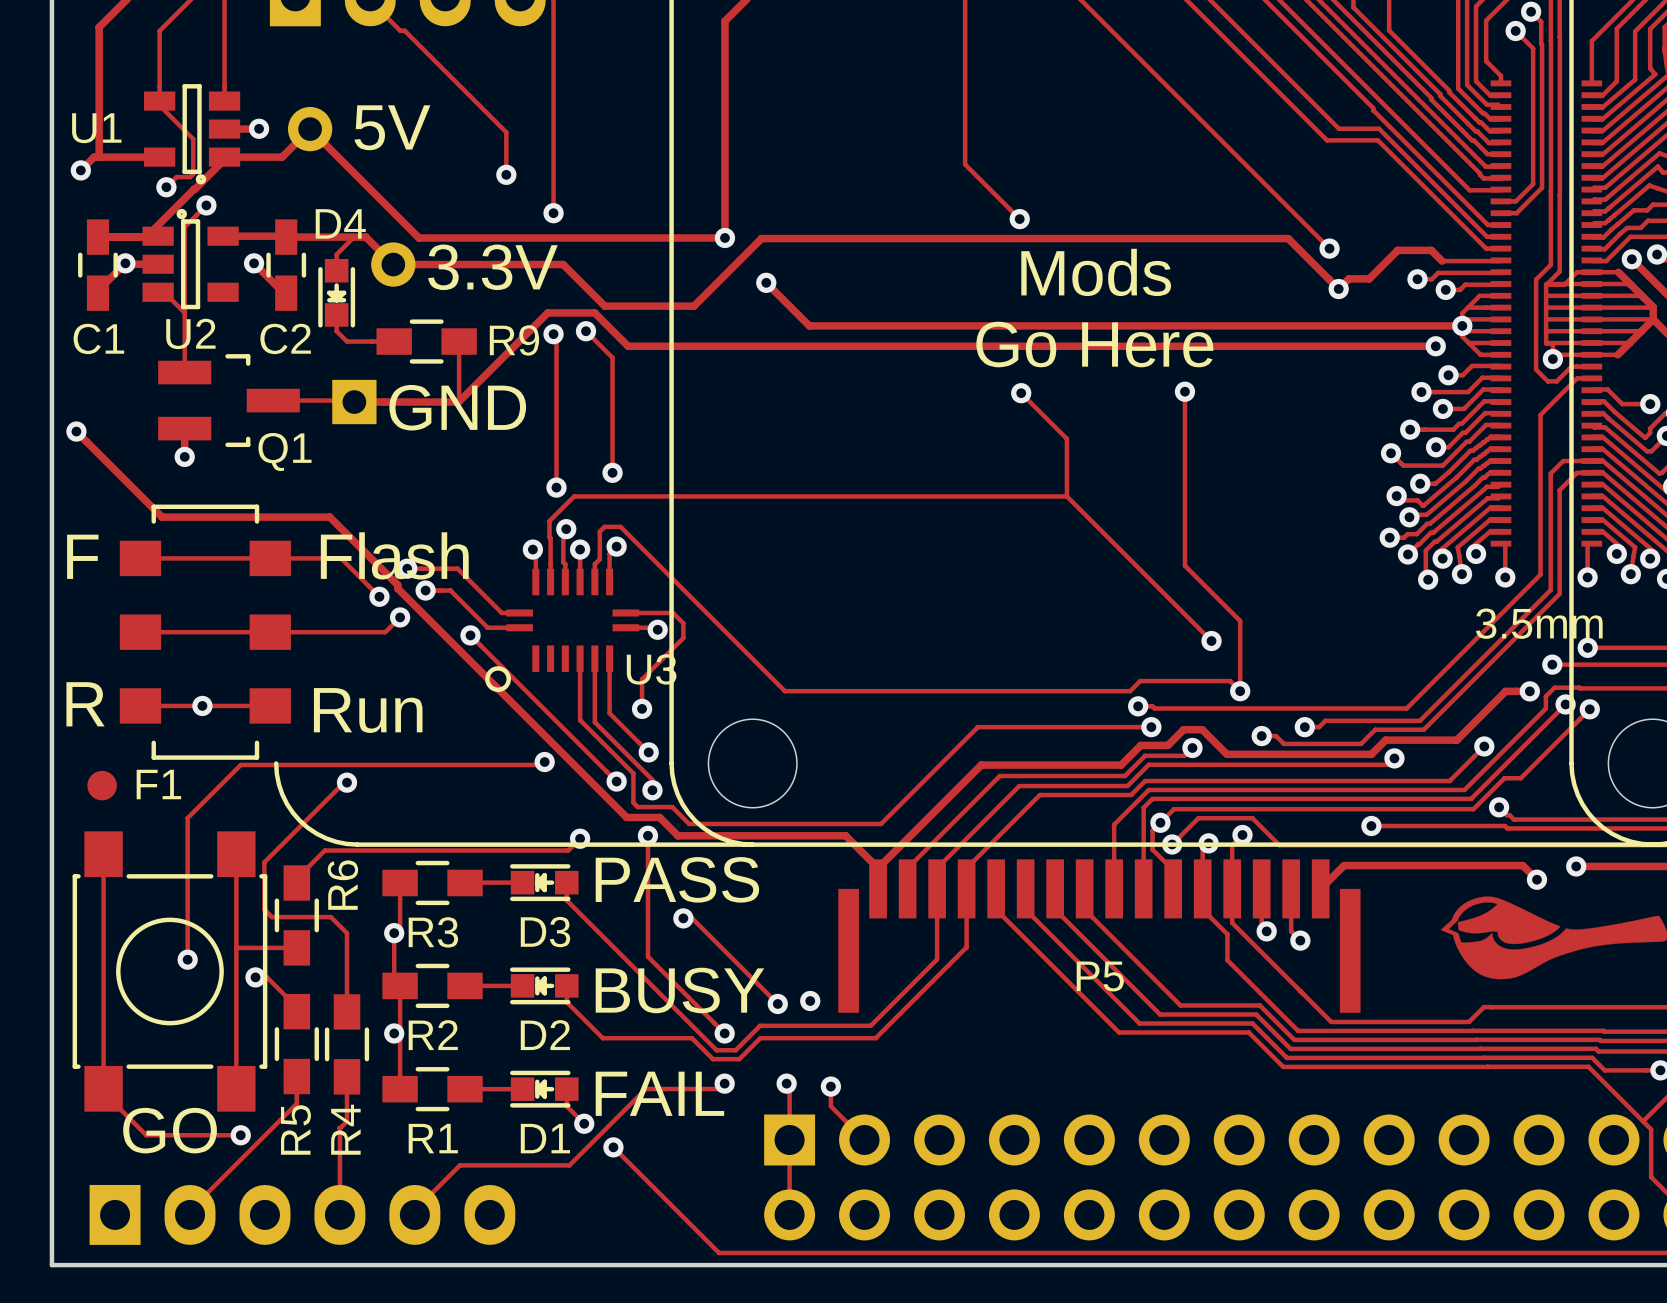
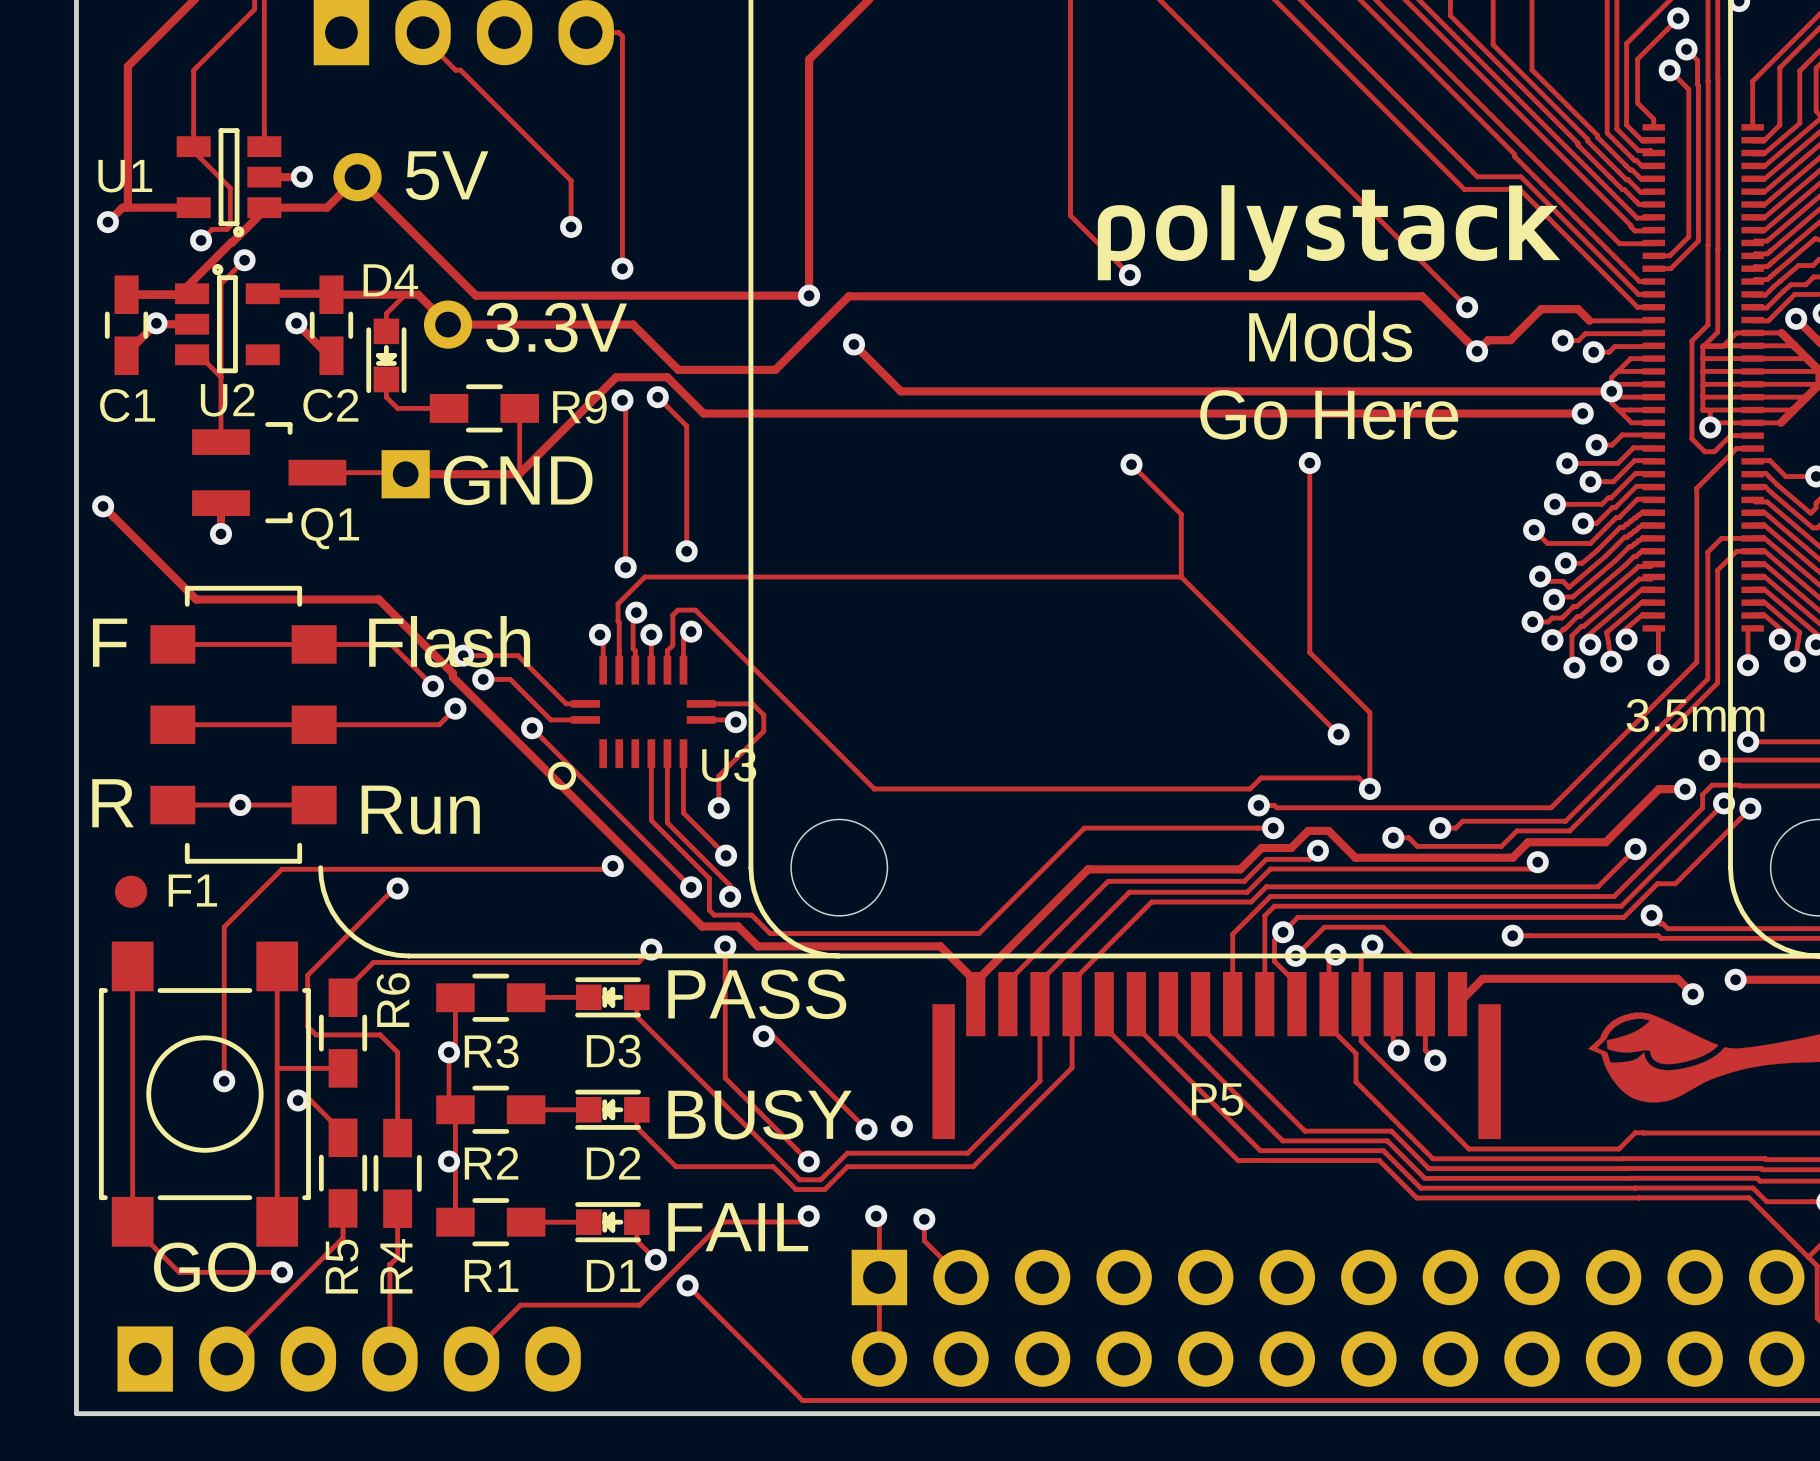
drawing: none -> [1097, 185, 1561, 282]
text position: Mods (1096, 272) -> Mods (1330, 336)
text position: Go Here (1094, 344) -> Go Here (1329, 414)

